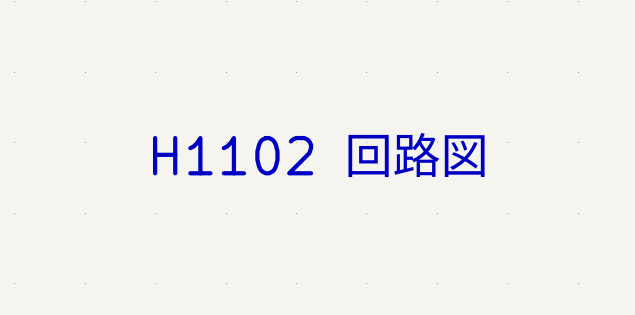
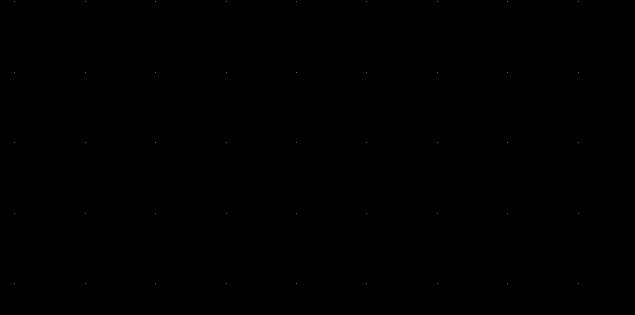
text: H1102 回路図 (319, 154) -> none

